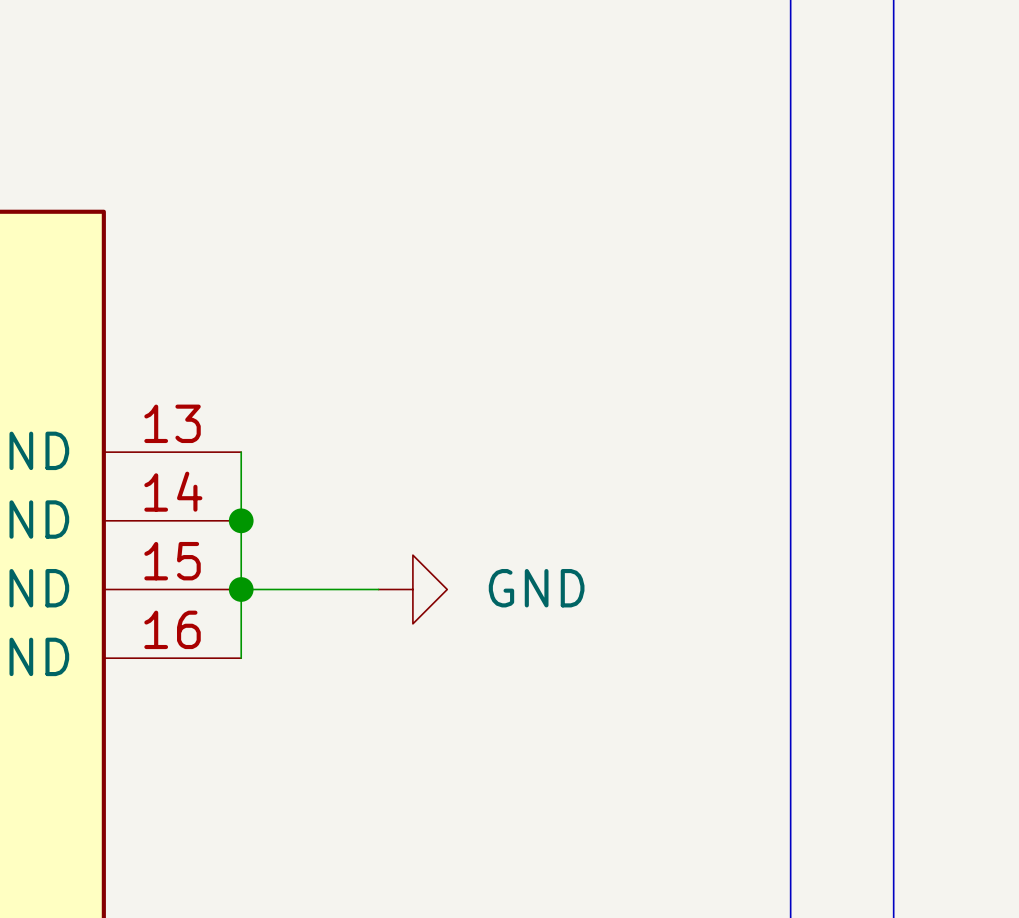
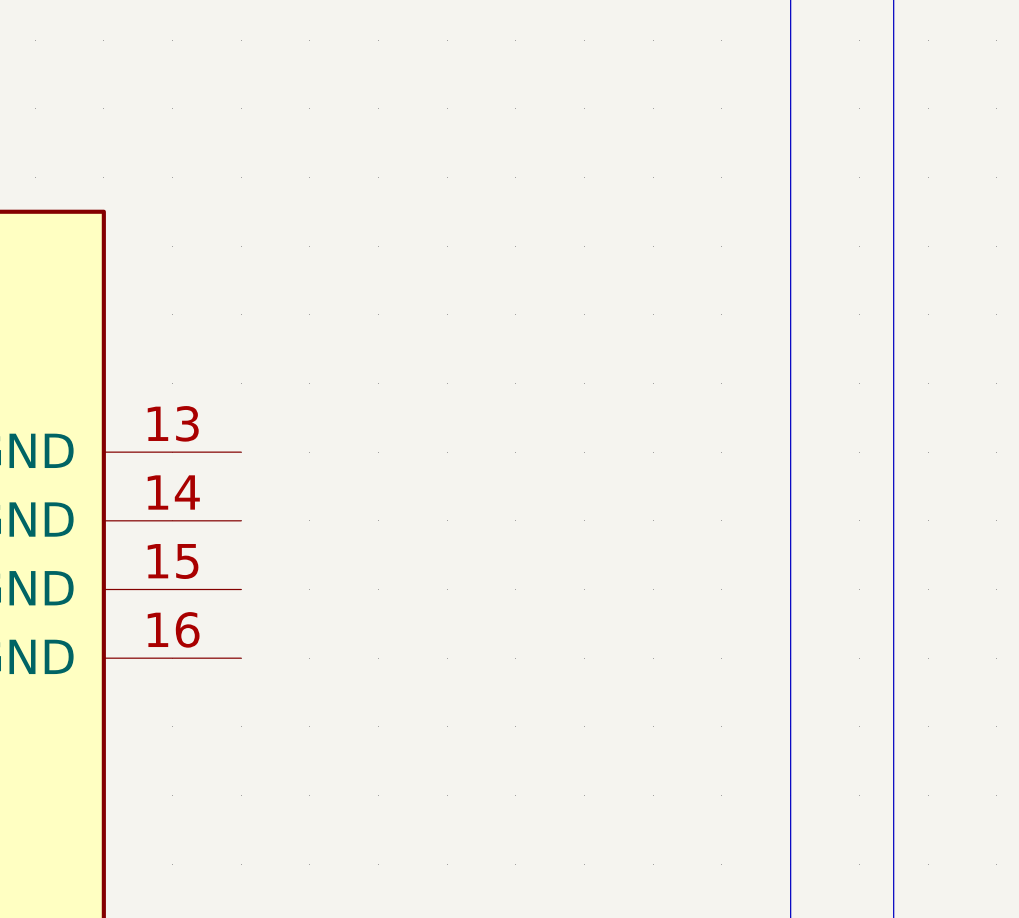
wire: (241, 452) (241, 658) -> none
junction: (241, 520) -> none
wire: (241, 589) (378, 589) -> none
junction: (241, 589) -> none
power symbol: GND (412, 589) -> none

